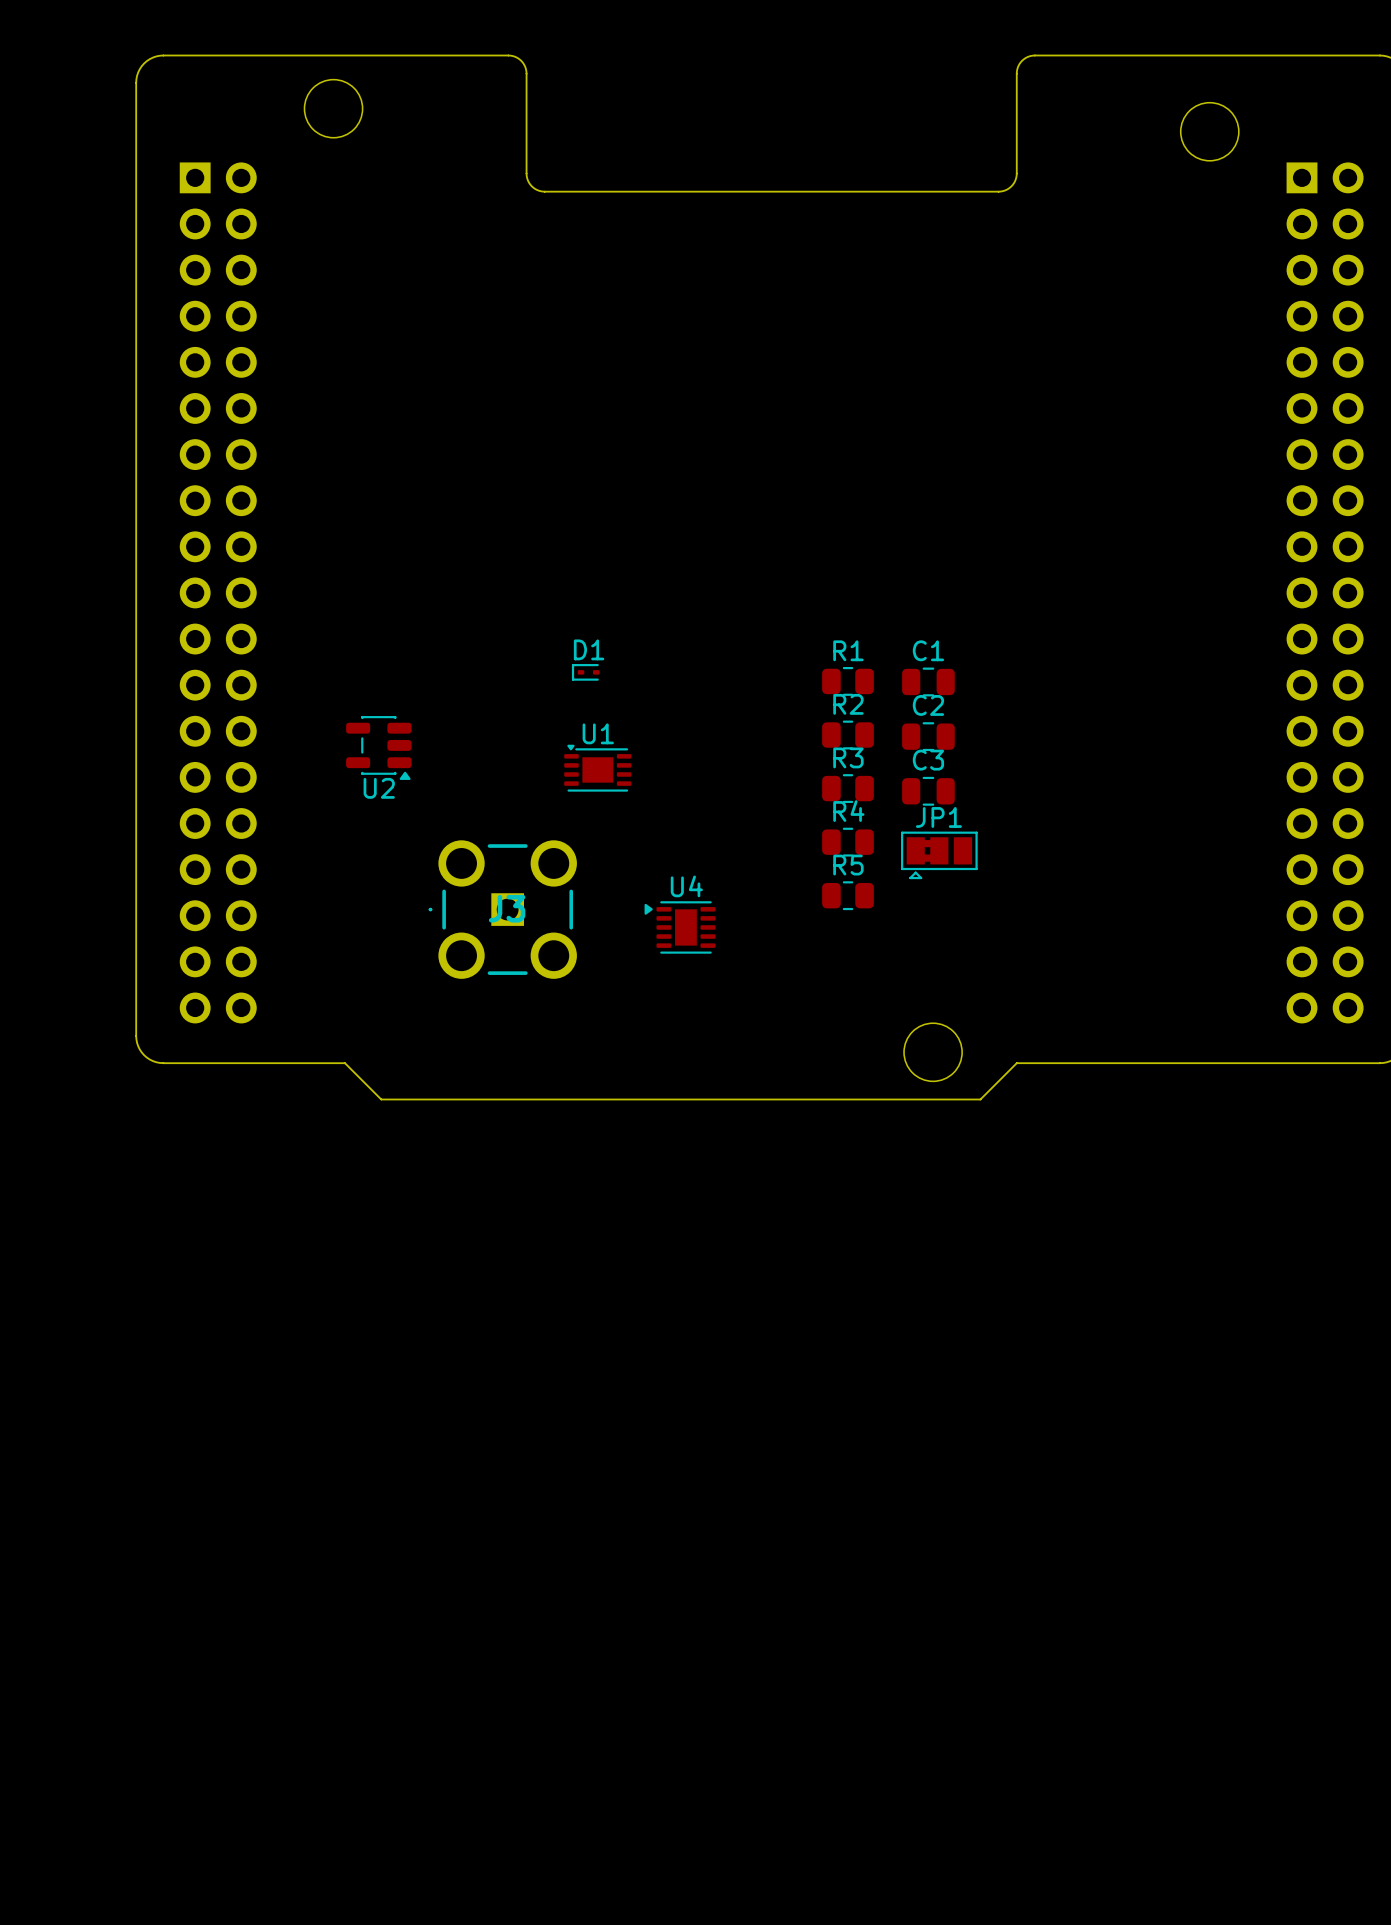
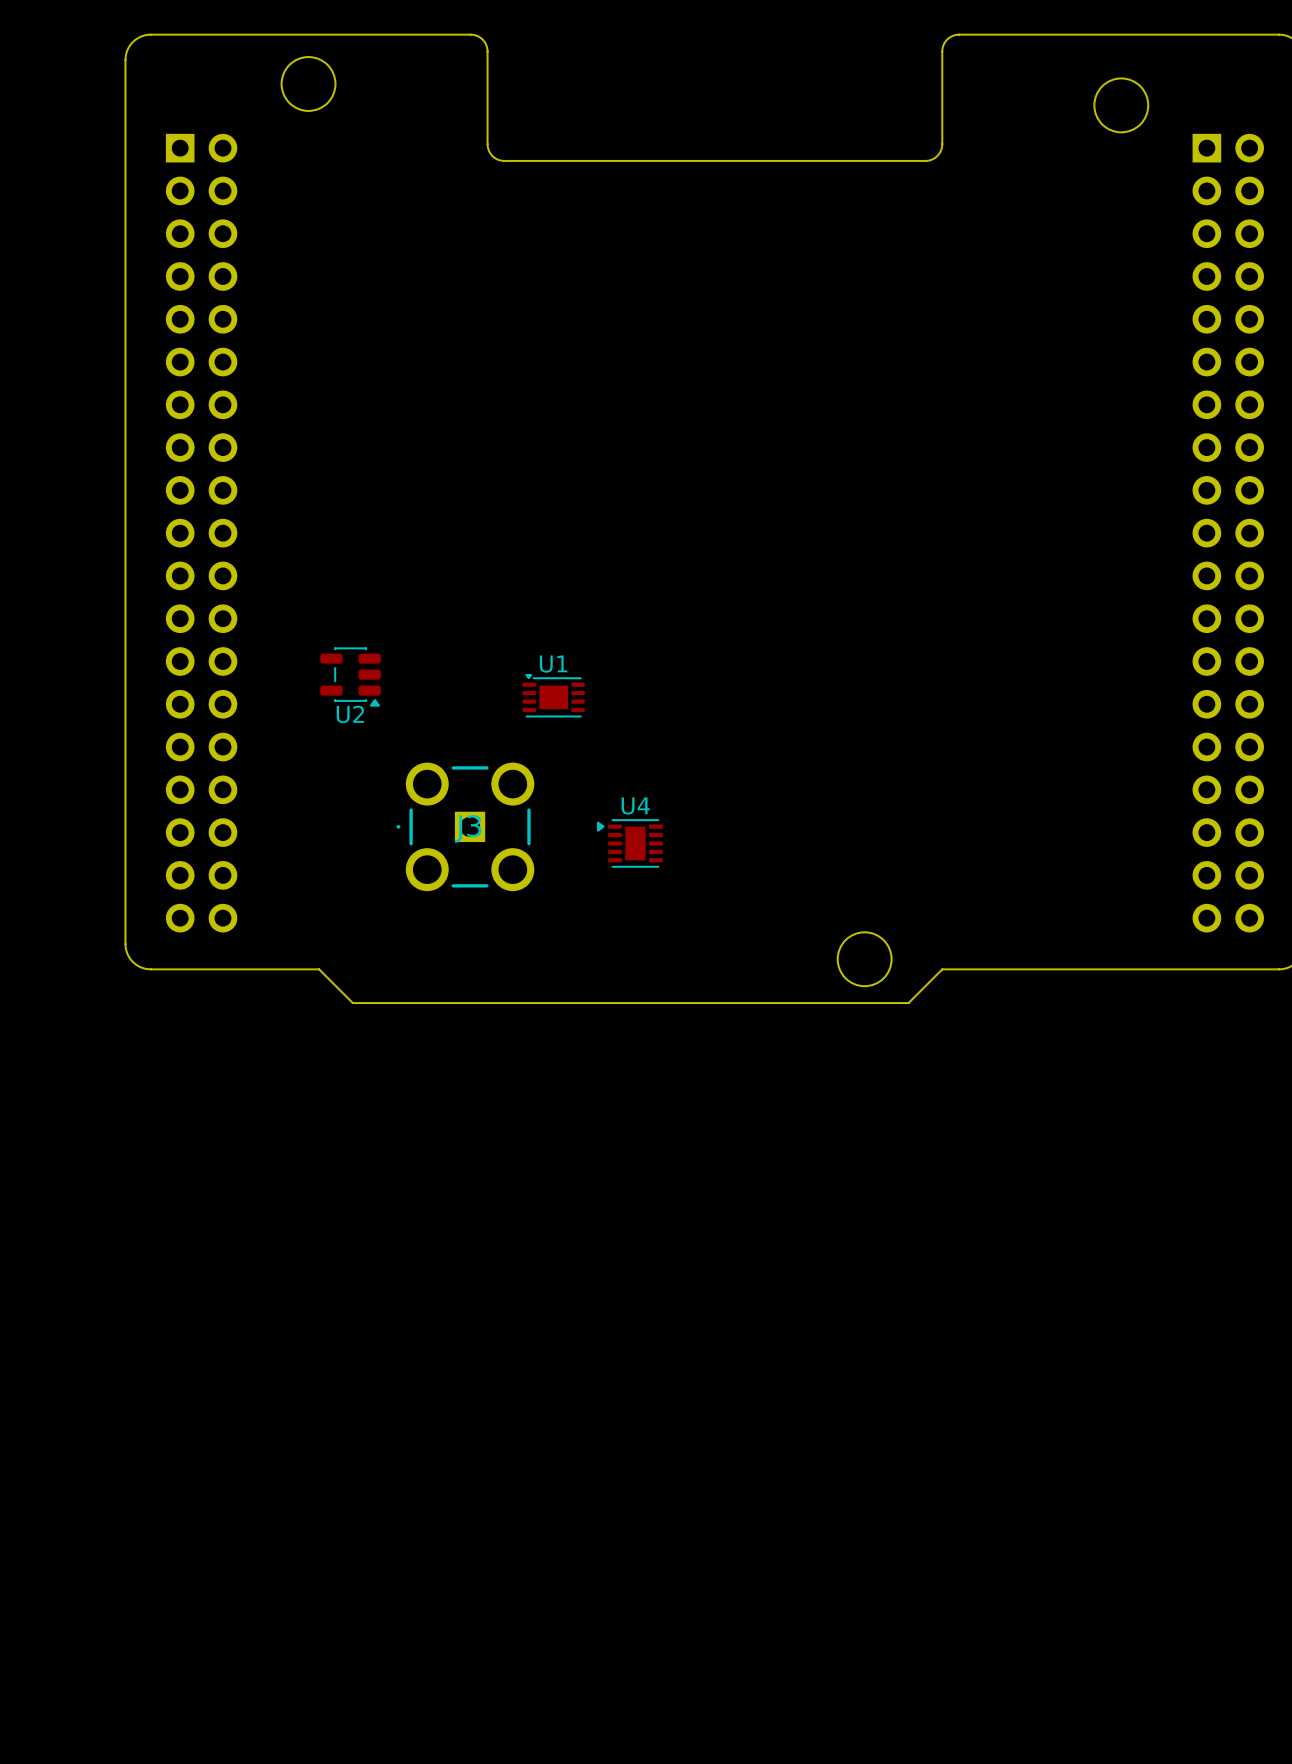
D1: (585, 672) -> none
R1: (848, 681) -> none
C1: (928, 681) -> none
R2: (848, 735) -> none
C2: (928, 736) -> none
R3: (848, 788) -> none
C3: (928, 791) -> none
R4: (848, 842) -> none
JP1: (939, 855) -> none
R5: (848, 895) -> none

